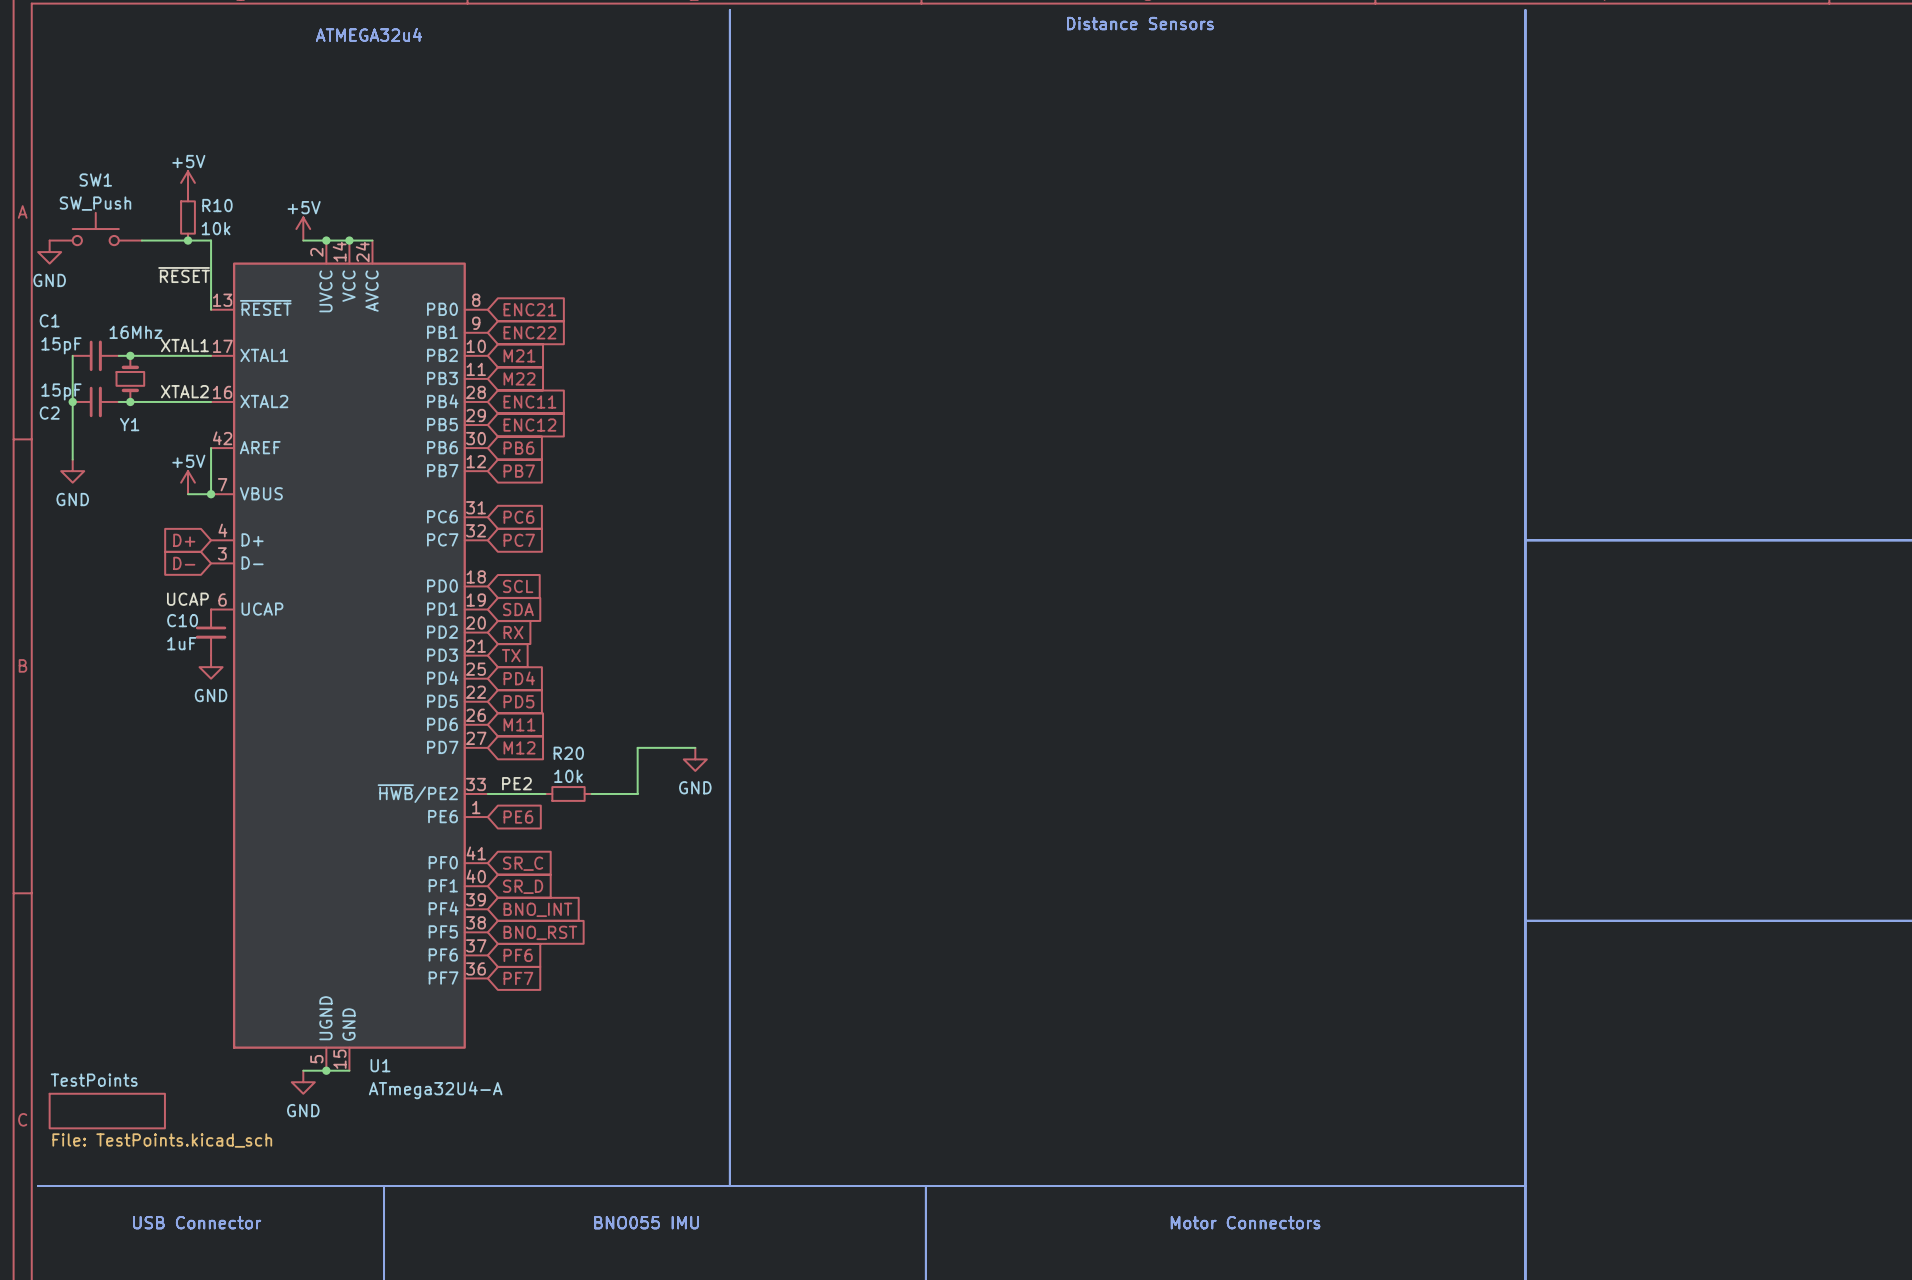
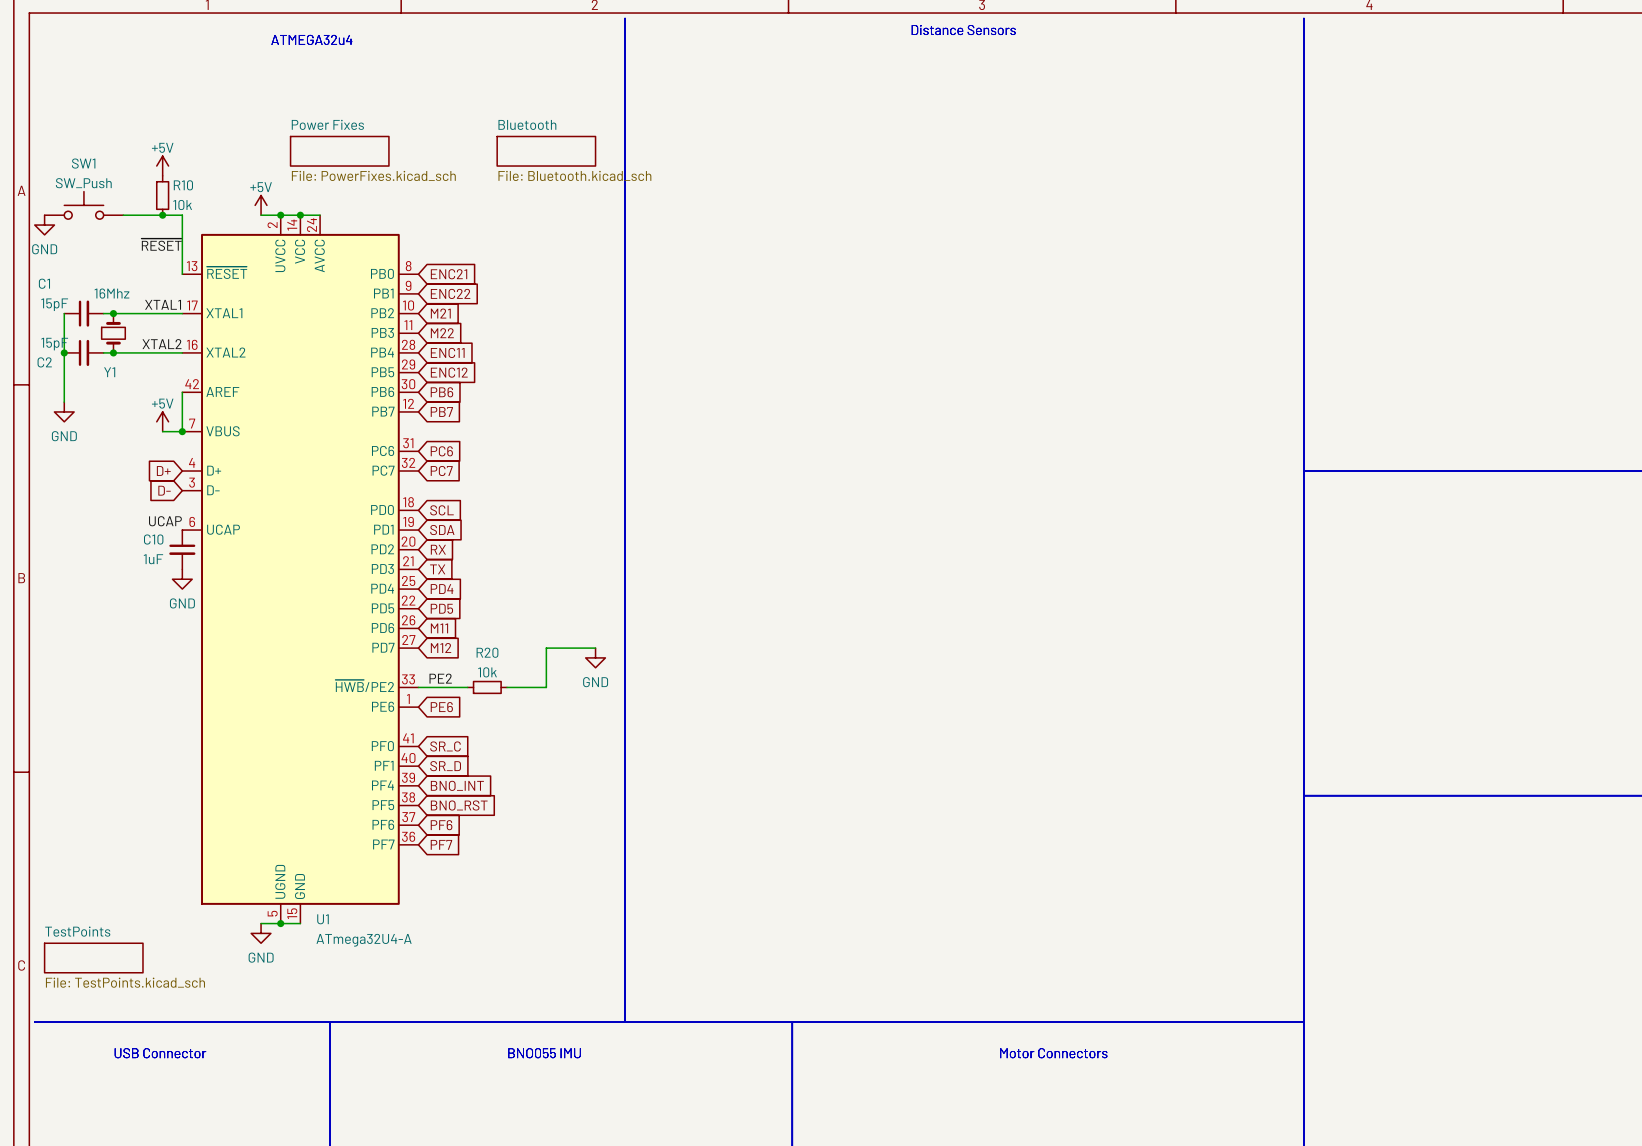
sheet Power Fixes: none -> File: PowerFixes.kicad_sch (339, 151)
sheet Bluetooth: none -> File: Bluetooth.kicad_sch (546, 151)

